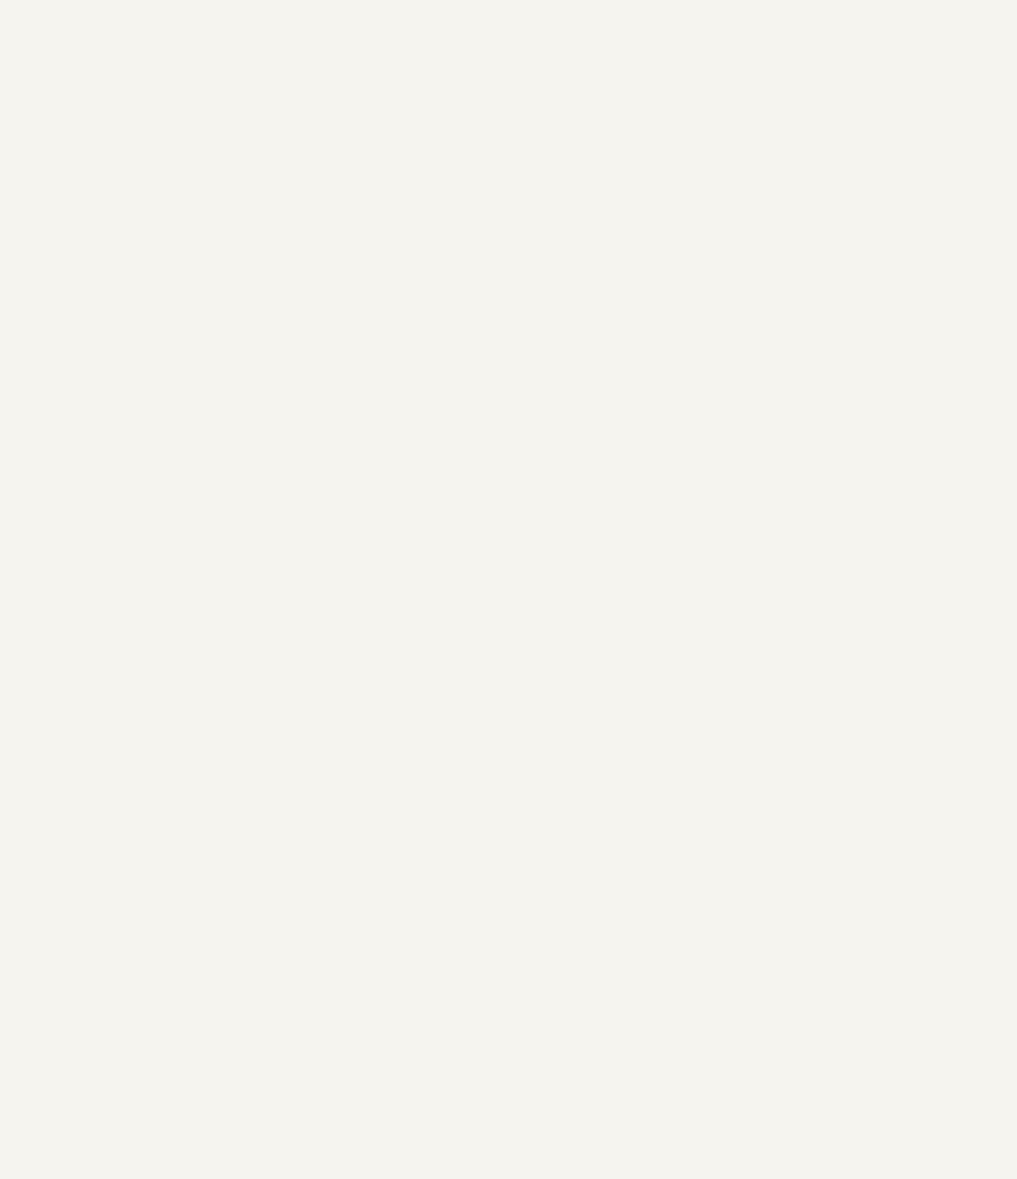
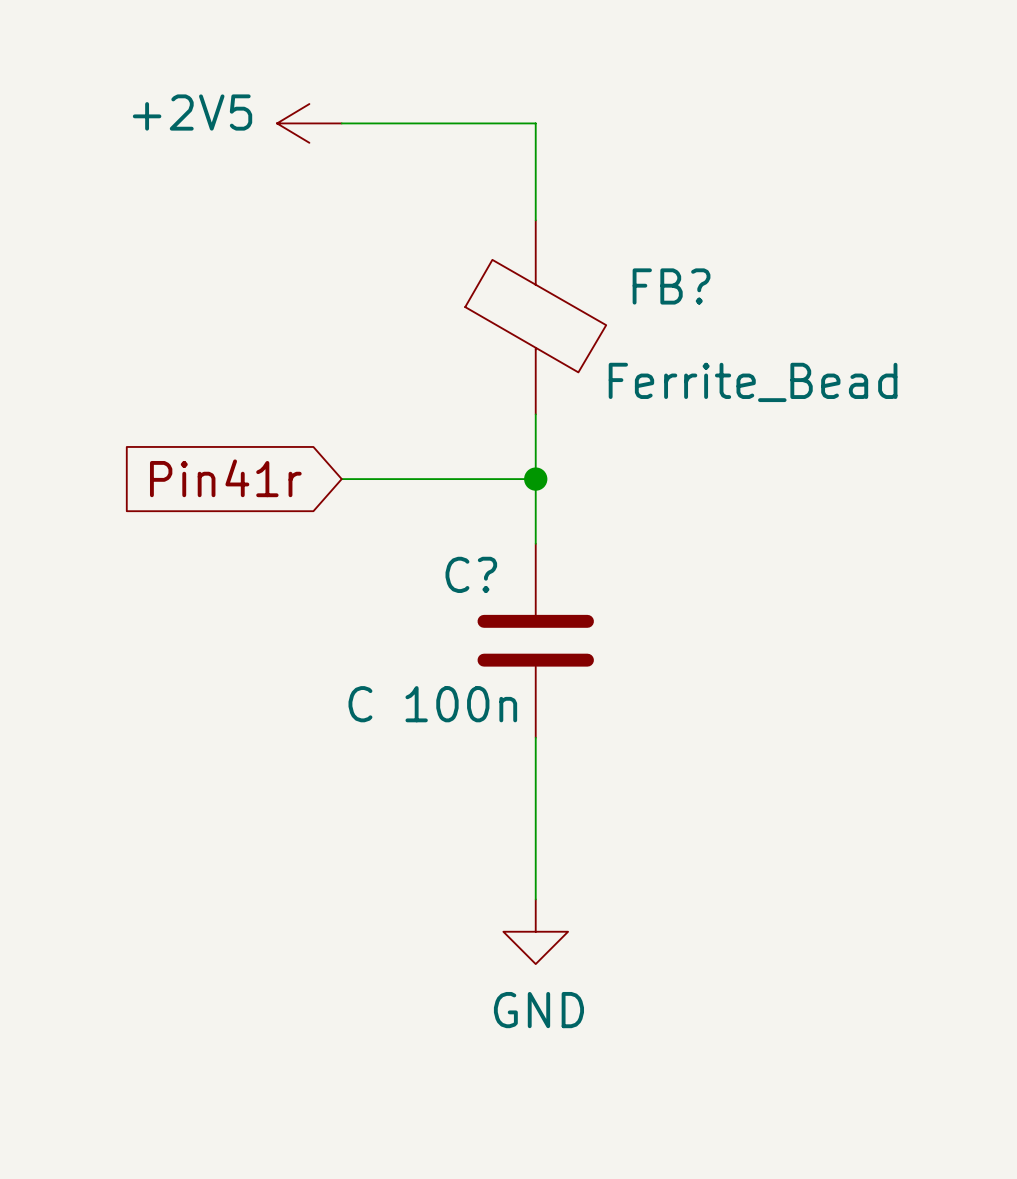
power symbol: none -> +2V5 (309, 123)
wire: none -> (341, 123) (535, 123) (535, 220)
FB?: none -> Ferrite_Bead (535, 317)
wire: none -> (535, 414) (535, 543)
global label: none -> Pin41r (225, 478)
wire: none -> (341, 479) (535, 479)
junction: none -> (535, 479)
C?: none -> C 100n (535, 640)
wire: none -> (535, 737) (535, 899)
power symbol: none -> GND (535, 931)

